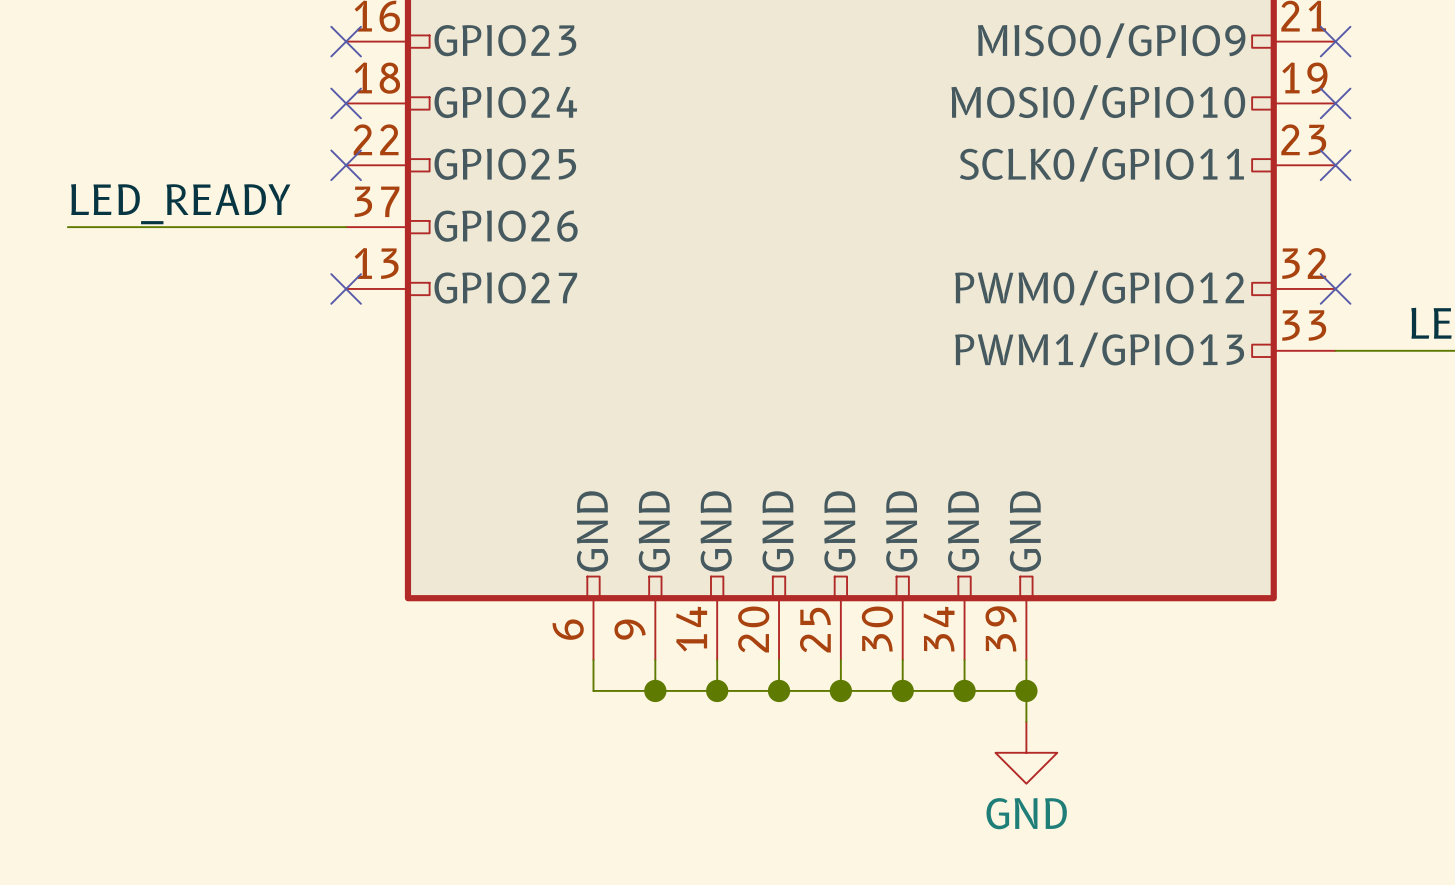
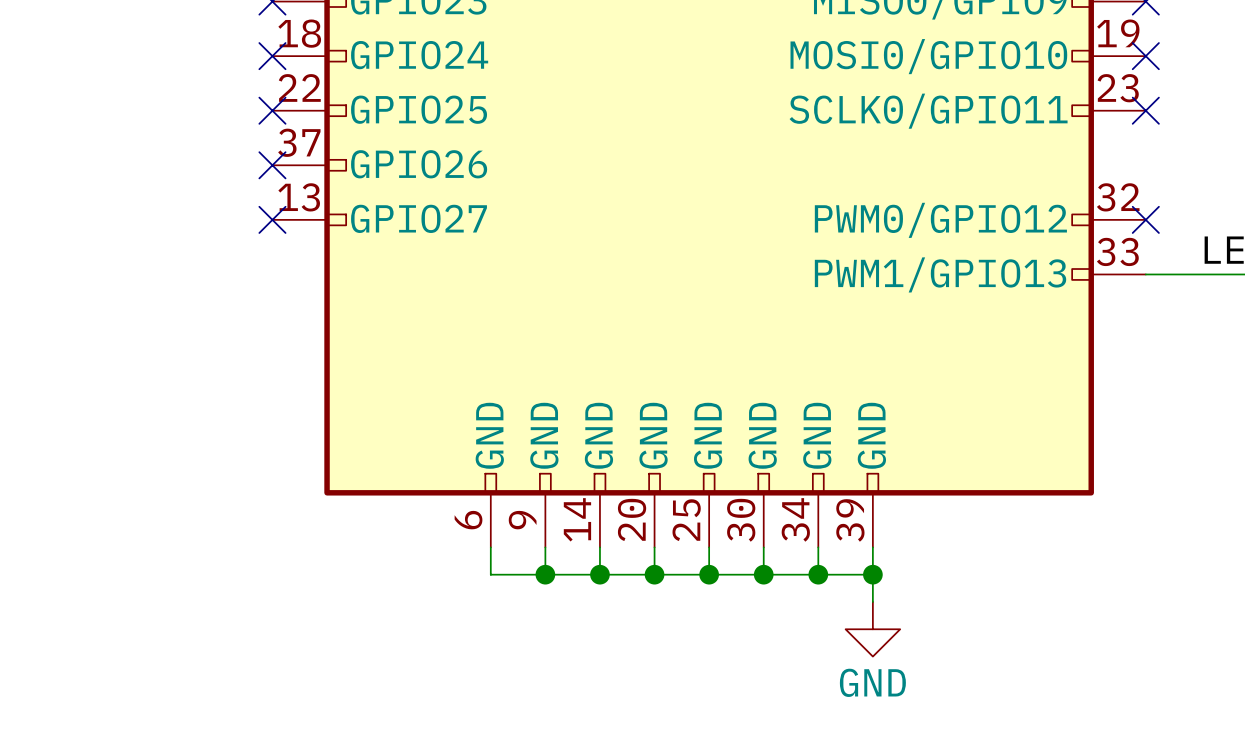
label: LED_READY (180, 204) -> none
wire: (67, 227) (346, 227) -> none
no-connect mark: none -> (272, 165)

